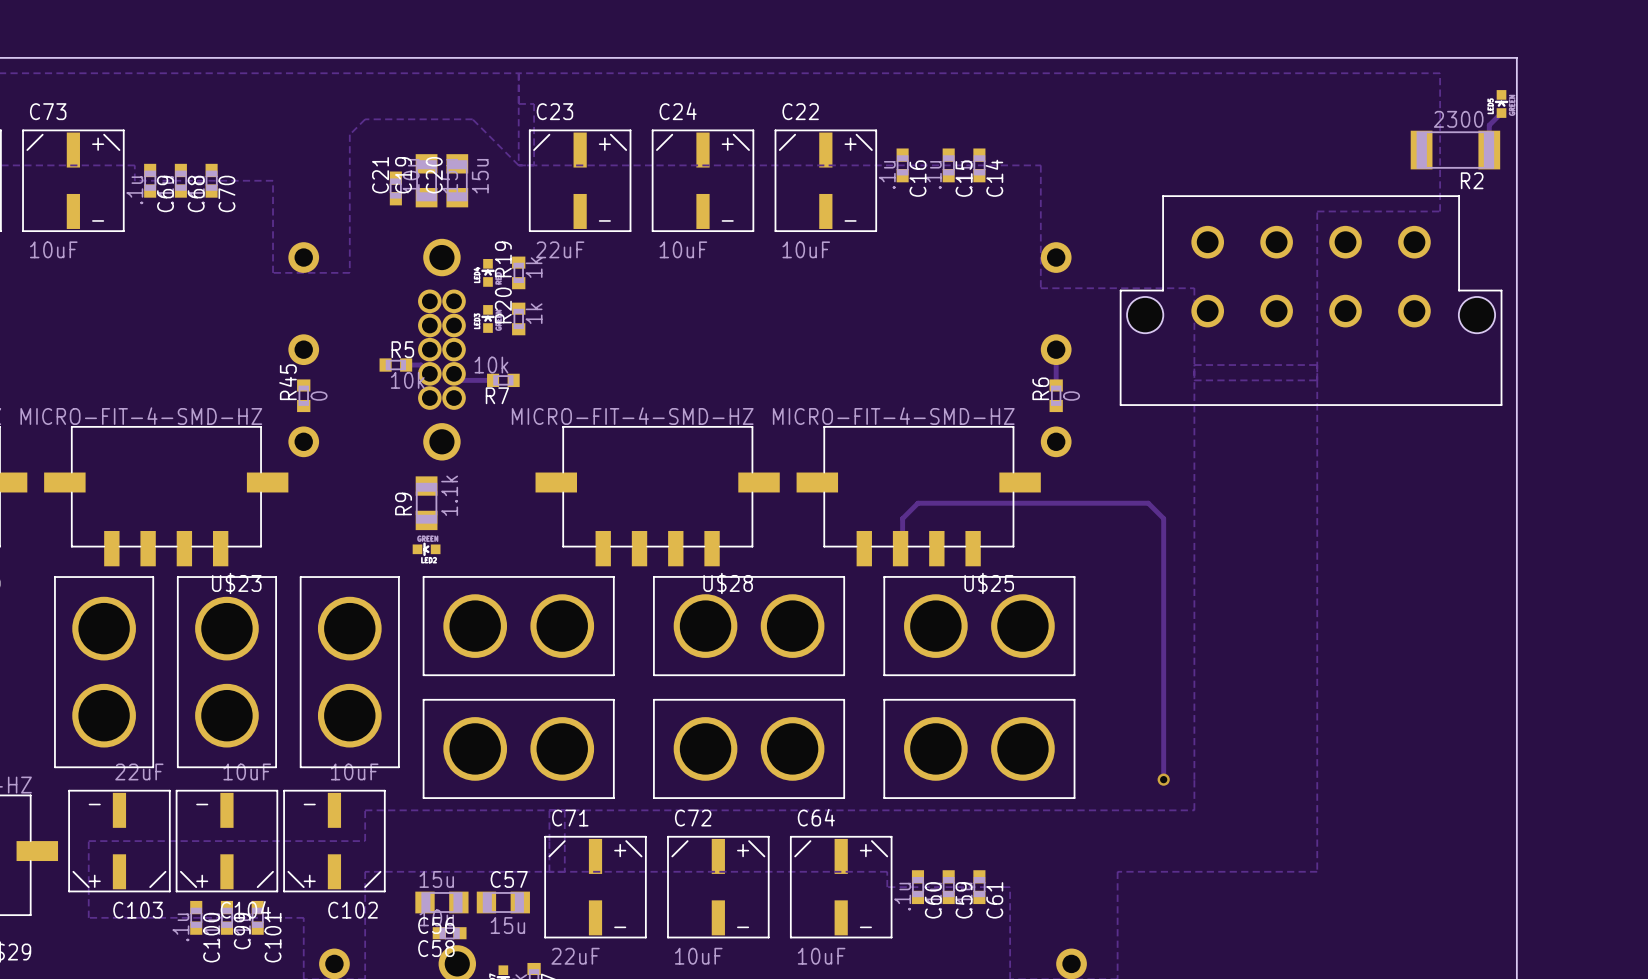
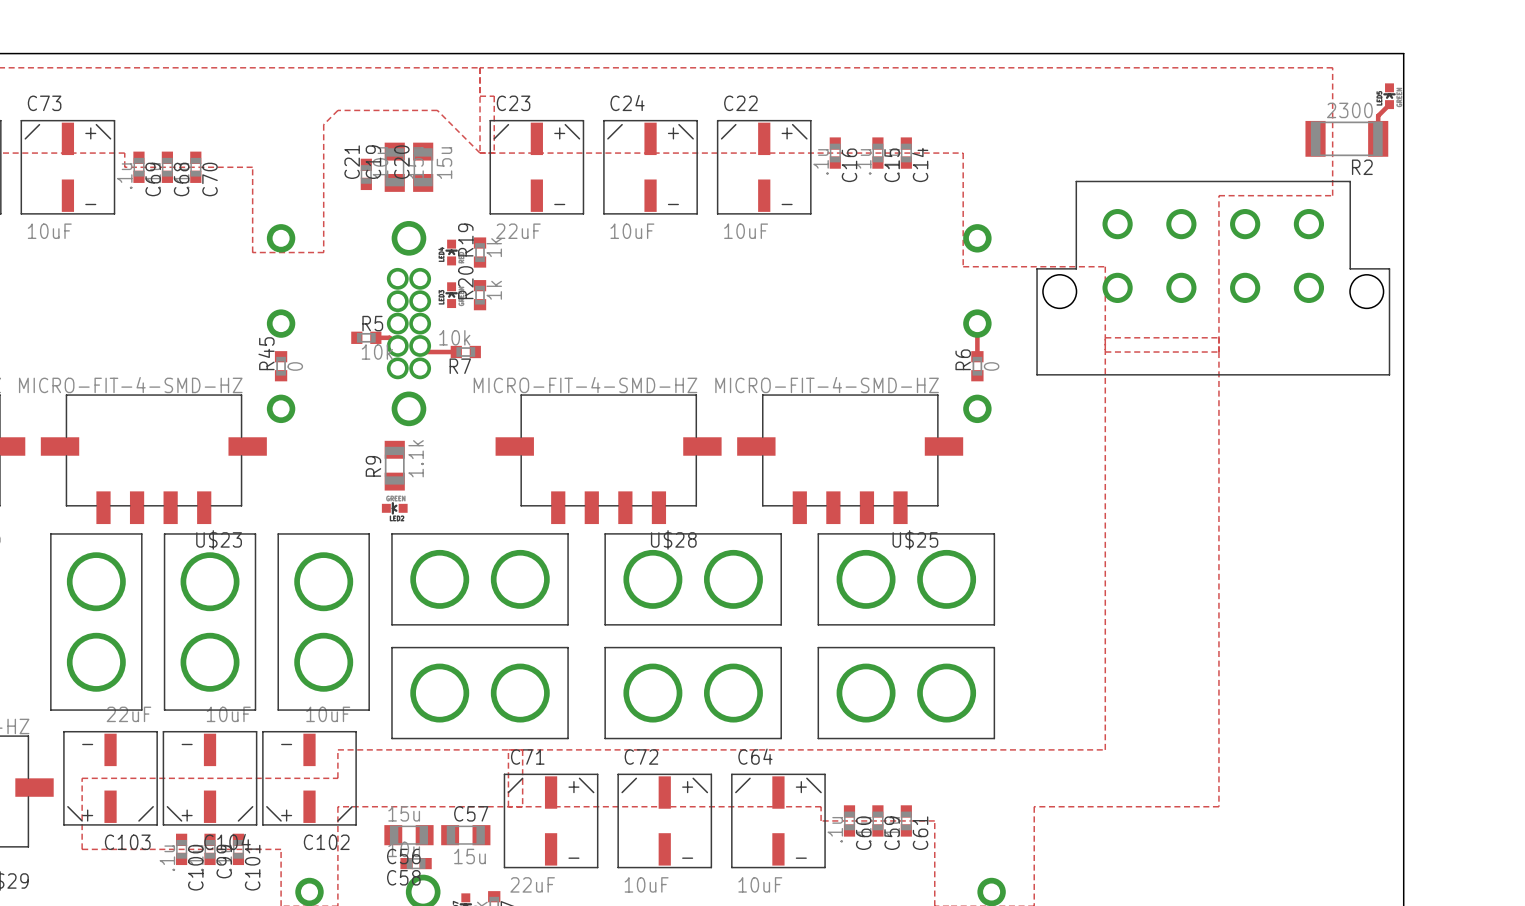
track: (900, 548) (902, 546) (902, 518) (917, 503) (1148, 503) (1163, 518) (1163, 779) -> none
via: (1163, 779) -> none

